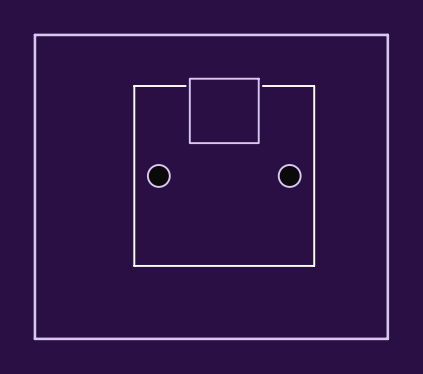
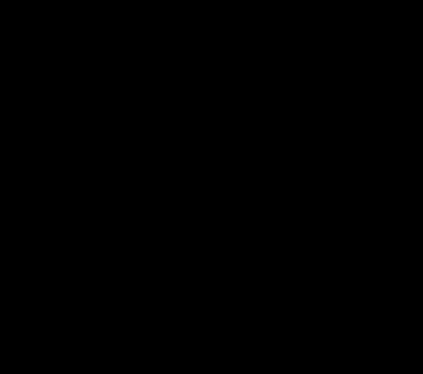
board edge: (387, 34) (34, 34) (34, 338) (387, 338) (387, 34) -> none
part: (224, 110) -> none
part: (224, 175) -> none

